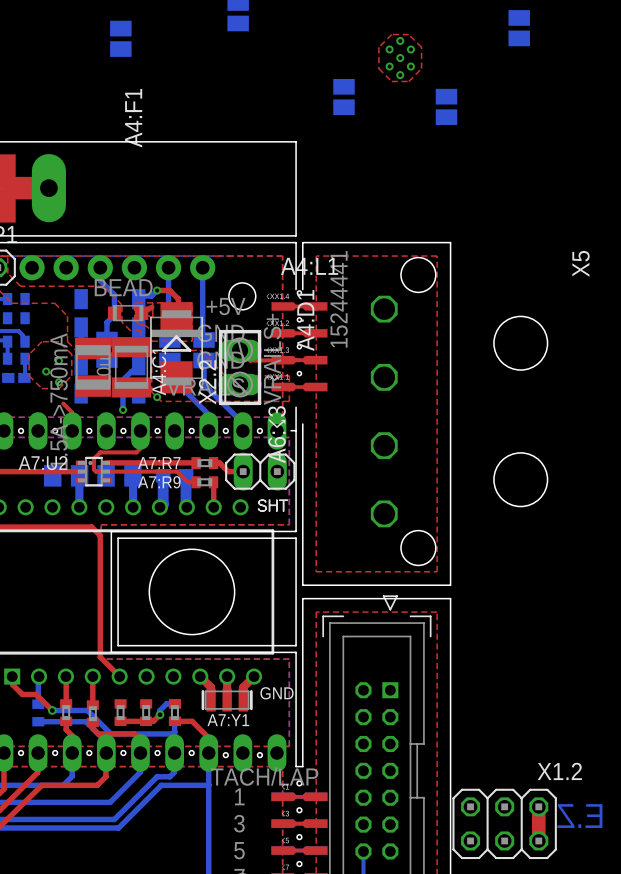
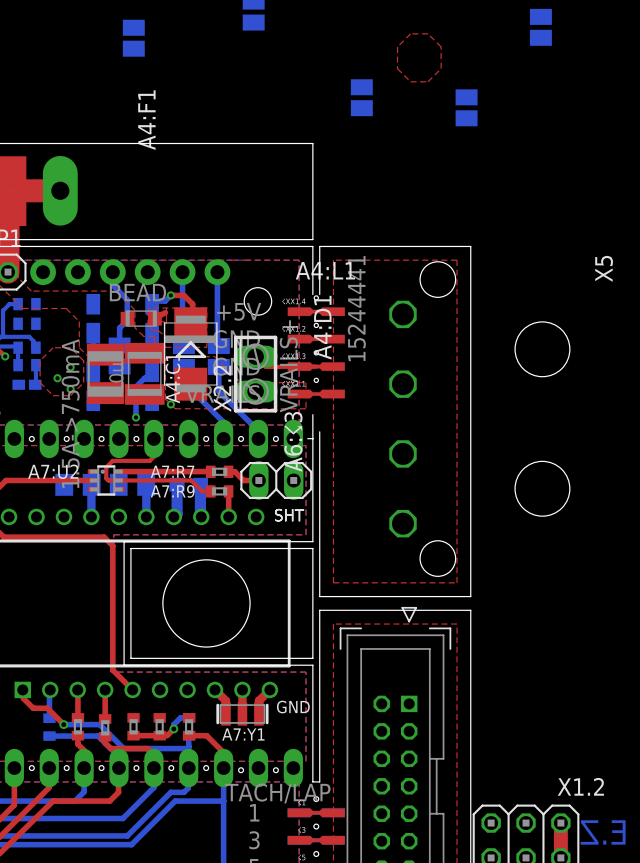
via: (400, 40) -> none
via: (389, 49) -> none
via: (410, 49) -> none
via: (400, 58) -> none
via: (389, 66) -> none
via: (410, 66) -> none
via: (400, 75) -> none
top track: (63, 403) (71, 412) (72, 430) -> none

